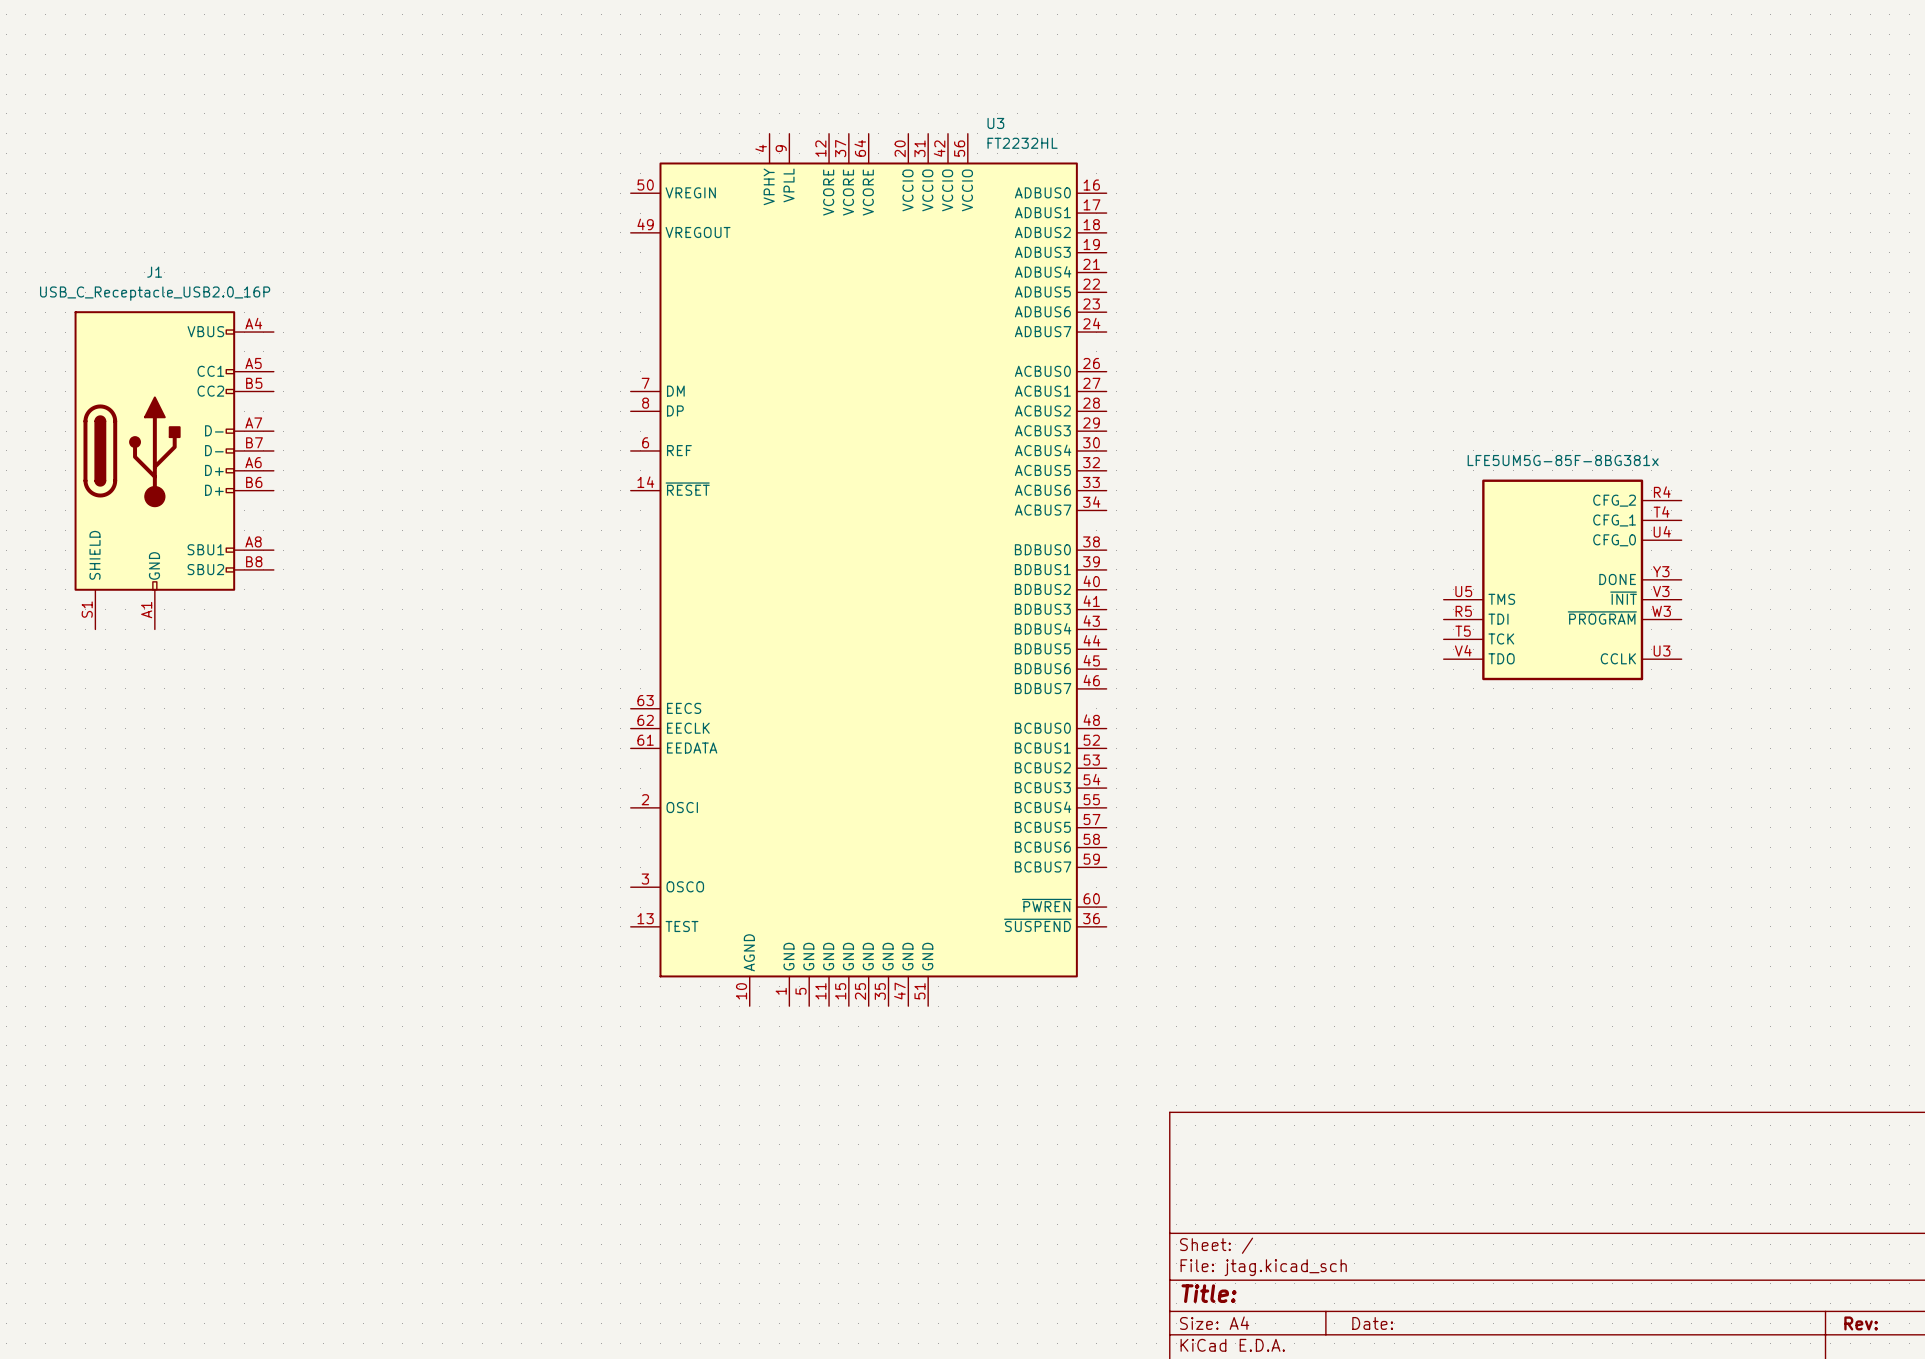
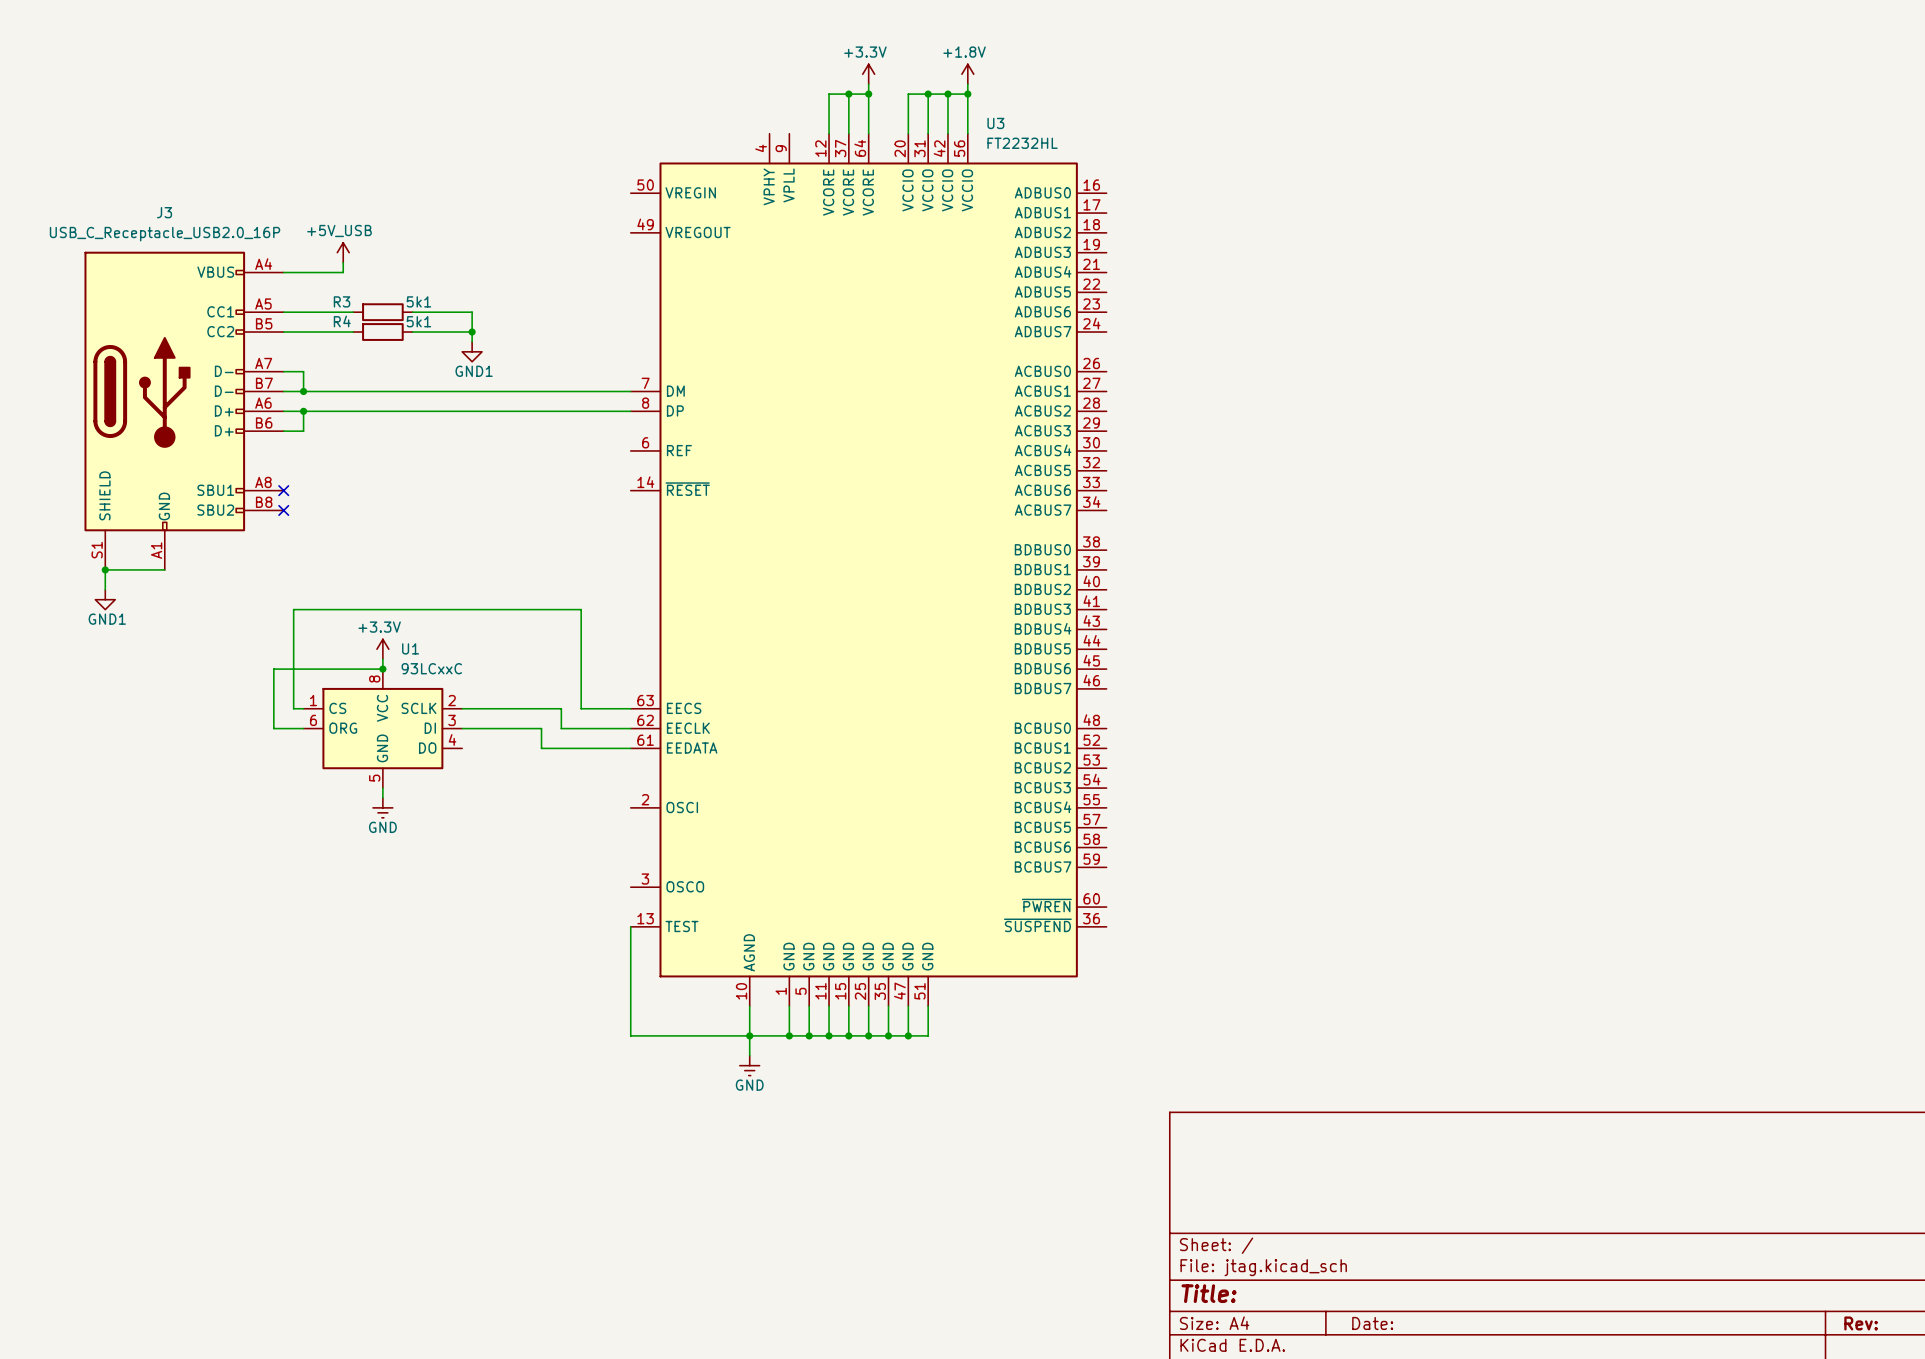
power symbol: none -> +3.3V (868, 74)
power symbol: none -> +1.8V (967, 74)
wire: none -> (868, 84) (868, 133)
wire: none -> (967, 84) (967, 133)
wire: none -> (848, 94) (848, 133)
junction: none -> (848, 94)
wire: none -> (868, 94) (829, 94) (829, 133)
junction: none -> (868, 94)
wire: none -> (928, 94) (928, 133)
junction: none -> (928, 94)
wire: none -> (947, 94) (947, 133)
junction: none -> (947, 94)
wire: none -> (967, 94) (908, 94) (908, 133)
junction: none -> (967, 94)
power symbol: none -> +5V_USB (343, 252)
wire: none -> (343, 262) (343, 272) (283, 272)
wire: none -> (283, 312) (353, 312)
R3: none -> 5k1 (382, 312)
wire: none -> (412, 312) (472, 312) (472, 341)
wire: none -> (283, 332) (353, 332)
R4: none -> 5k1 (382, 332)
wire: none -> (412, 332) (472, 332)
junction: none -> (472, 332)
power symbol: none -> GND1 (472, 351)
wire: none -> (283, 371) (303, 371) (303, 391)
wire: none -> (283, 391) (630, 391)
junction: none -> (303, 391)
J3: none -> USB_C_Receptacle_USB2.0_16P (184, 410)
wire: none -> (283, 411) (630, 411)
wire: none -> (303, 411) (303, 431) (283, 431)
junction: none -> (303, 411)
J1: USB_C_Receptacle_USB2.0_16P (174, 470) -> none
no-connect mark: none -> (283, 490)
no-connect mark: none -> (283, 510)
junction: none -> (105, 569)
part: LFE5UM5G-85F-8BG381x (1562, 579) -> none
power symbol: none -> GND1 (105, 599)
power symbol: none -> +3.3V (382, 649)
wire: none -> (382, 659) (382, 669) (273, 669) (273, 728) (303, 728)
junction: none -> (382, 669)
wire: none -> (303, 708) (293, 708) (293, 609) (581, 609) (581, 708) (630, 708)
wire: none -> (462, 708) (561, 708) (561, 728) (630, 728)
U1: none -> 93LCxxC (382, 728)
wire: none -> (462, 728) (541, 728) (541, 748) (630, 748)
wire: none -> (382, 788) (382, 797)
power symbol: none -> GND (382, 807)
wire: none -> (630, 926) (630, 1035) (928, 1035) (928, 1006)
wire: none -> (749, 1006) (749, 1055)
wire: none -> (789, 1006) (789, 1035)
wire: none -> (809, 1006) (809, 1035)
wire: none -> (829, 1006) (829, 1035)
wire: none -> (848, 1006) (848, 1035)
wire: none -> (868, 1006) (868, 1035)
wire: none -> (888, 1006) (888, 1035)
wire: none -> (908, 1006) (908, 1035)
junction: none -> (749, 1035)
junction: none -> (789, 1035)
junction: none -> (809, 1035)
junction: none -> (829, 1035)
junction: none -> (848, 1035)
junction: none -> (868, 1035)
junction: none -> (888, 1035)
junction: none -> (908, 1035)
power symbol: none -> GND (749, 1065)

